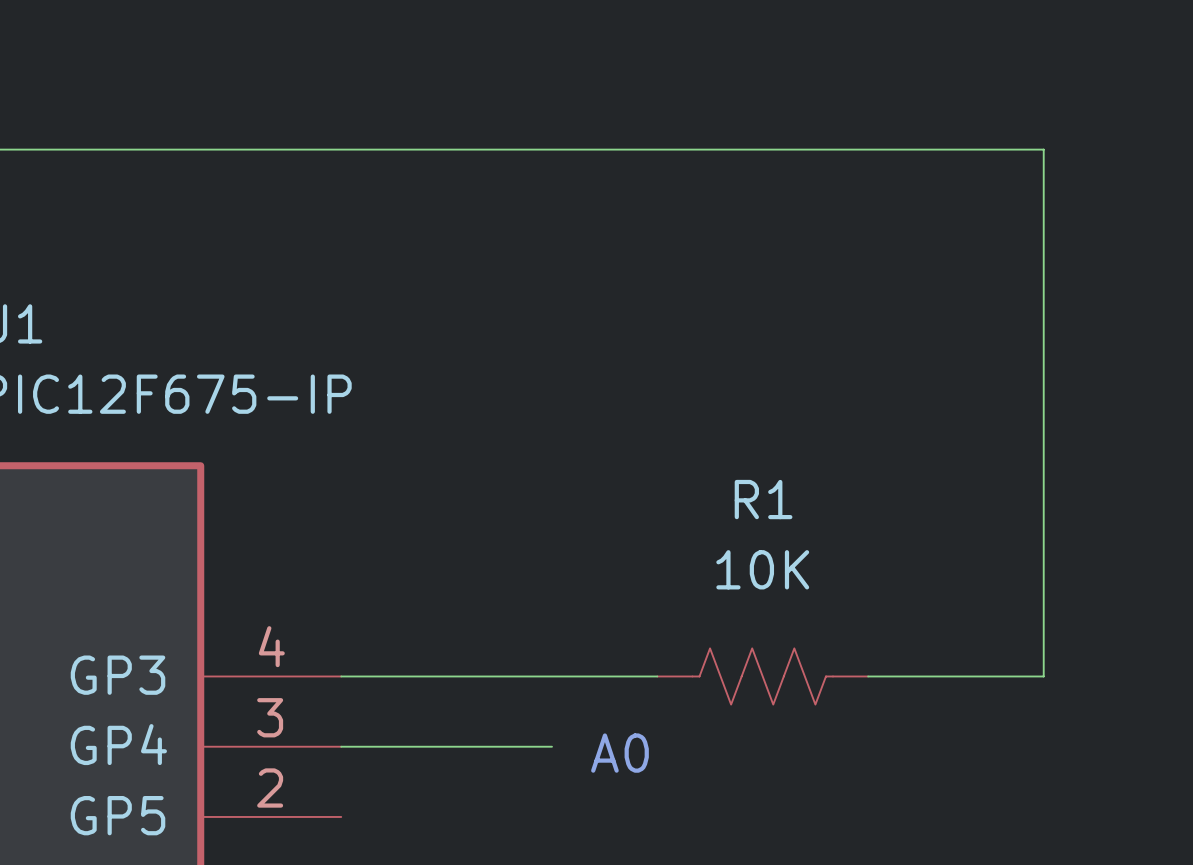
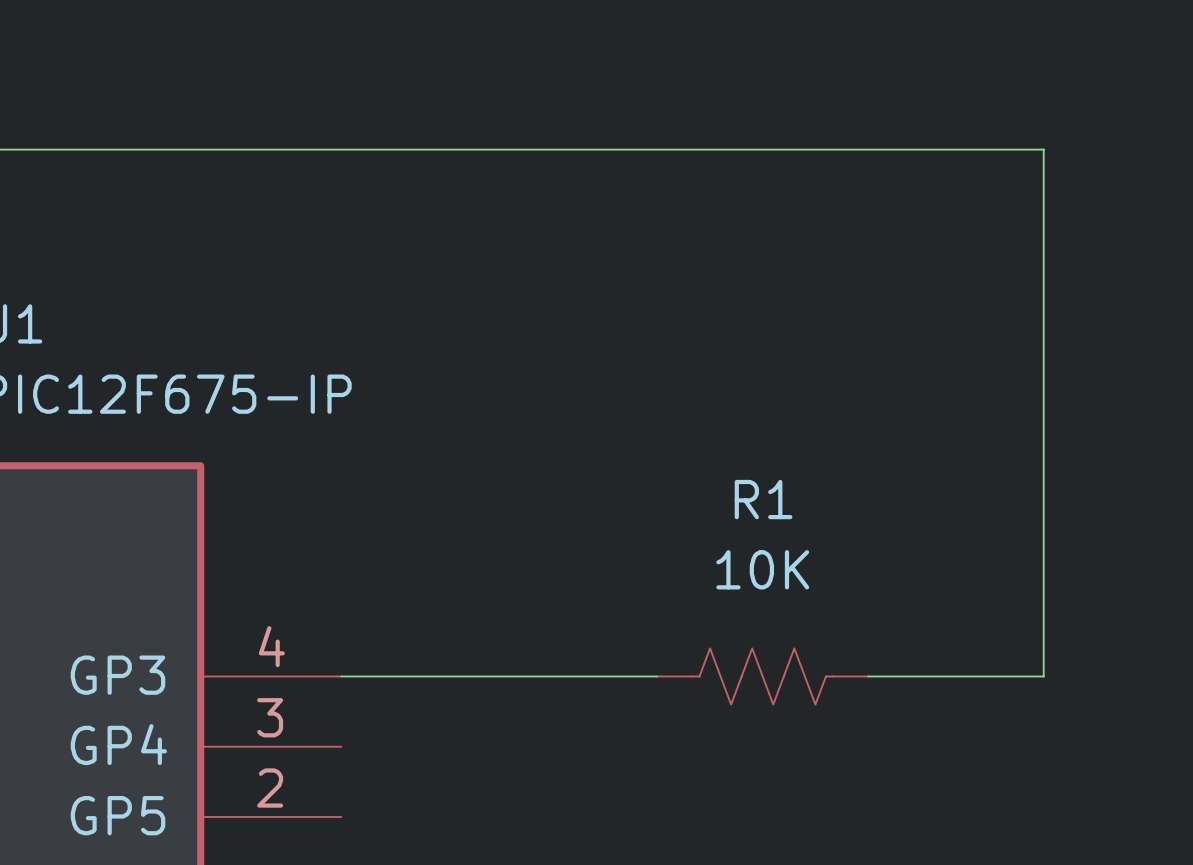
wire: (341, 746) (551, 746) -> none
text: A0 (619, 753) -> none

